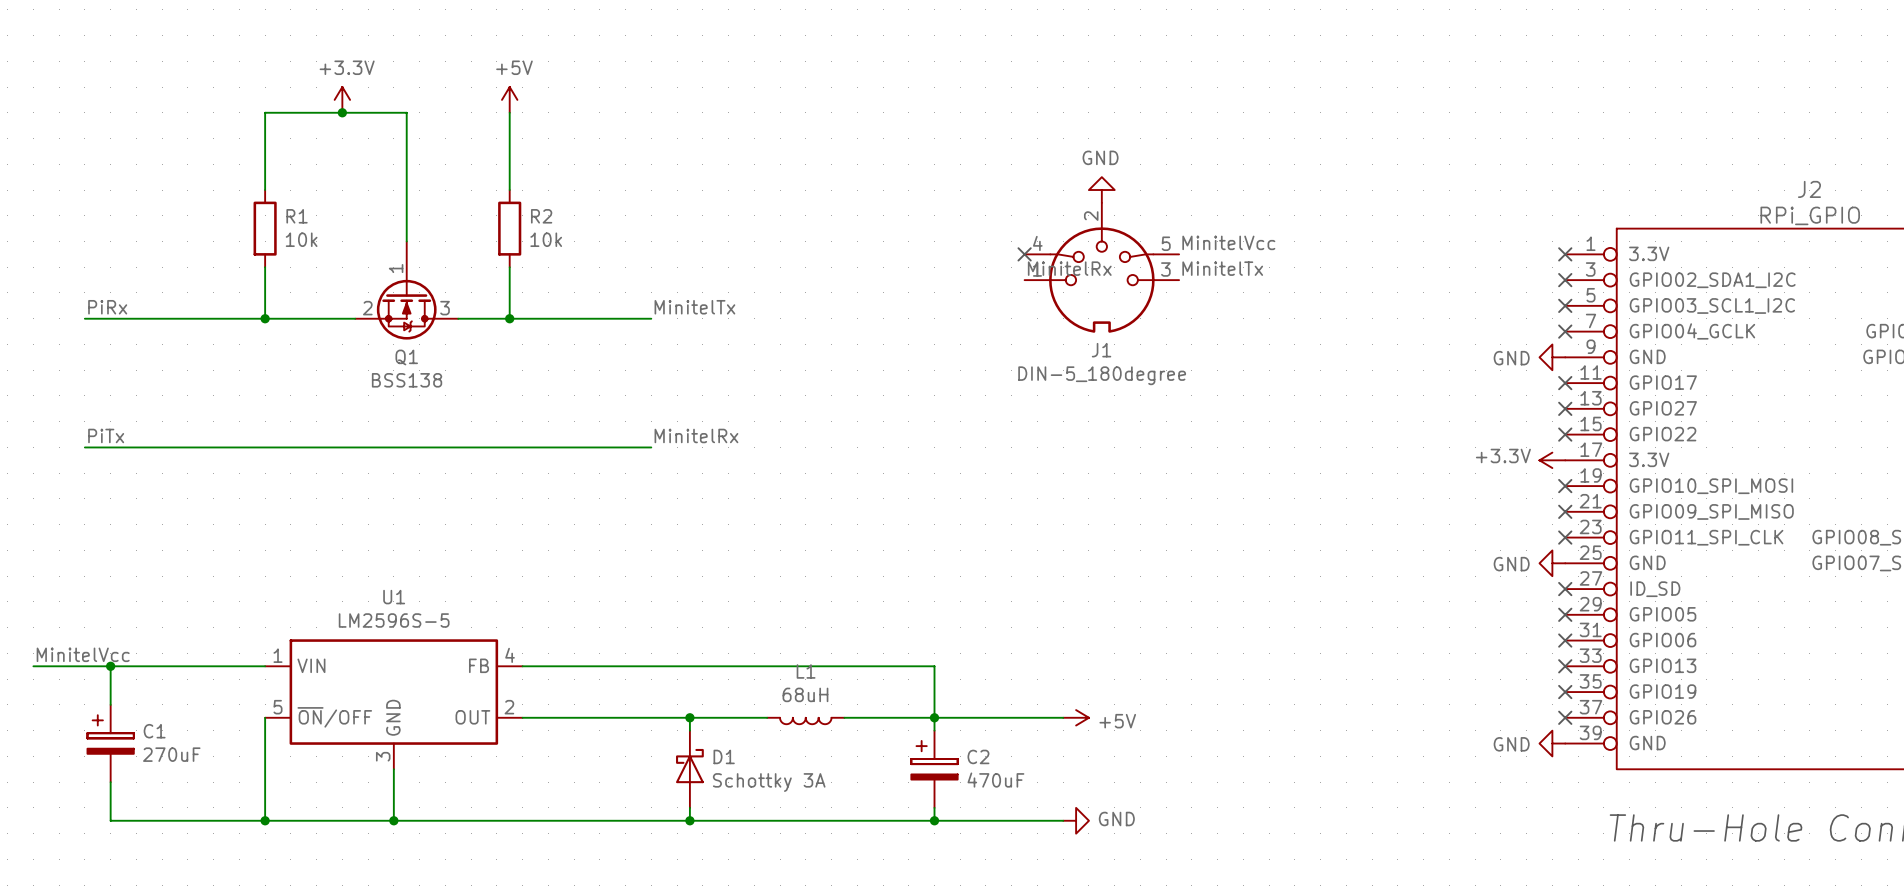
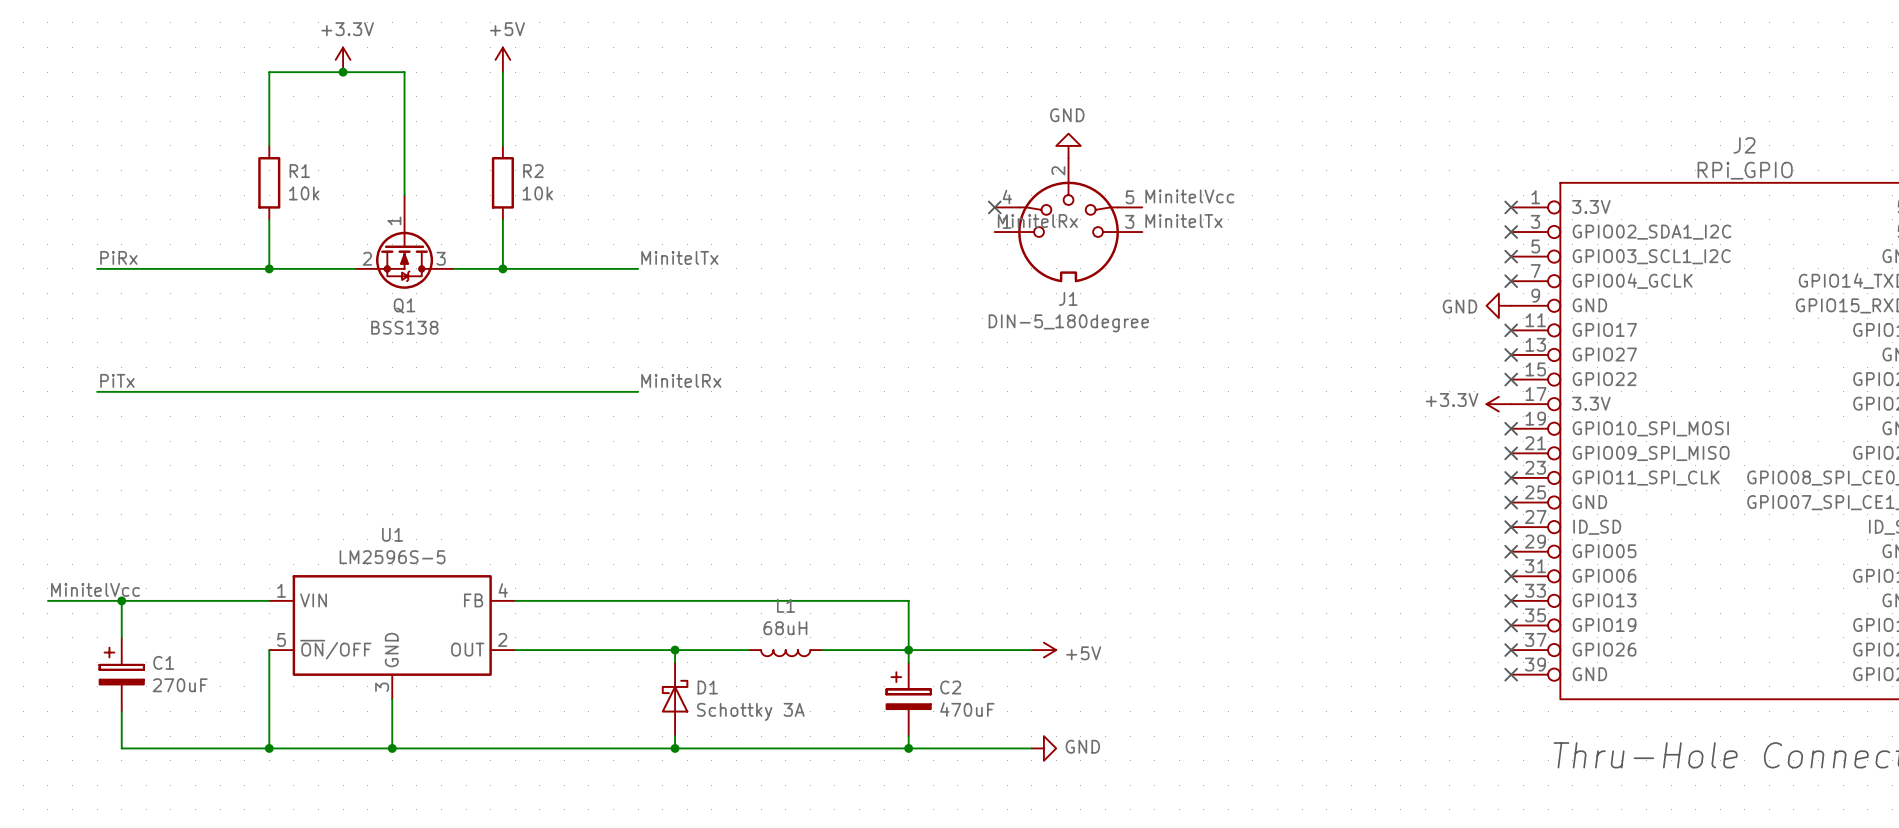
power symbol: GND (1552, 563) -> none
no-connect mark: none -> (1511, 502)
power symbol: GND (1552, 743) -> none
no-connect mark: none -> (1511, 674)

